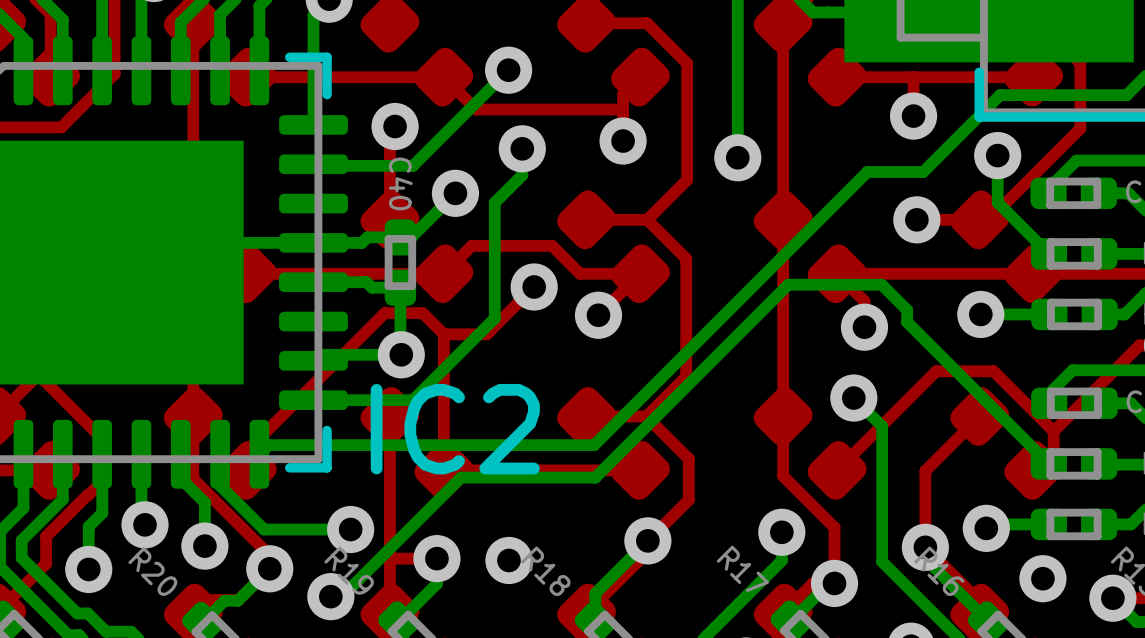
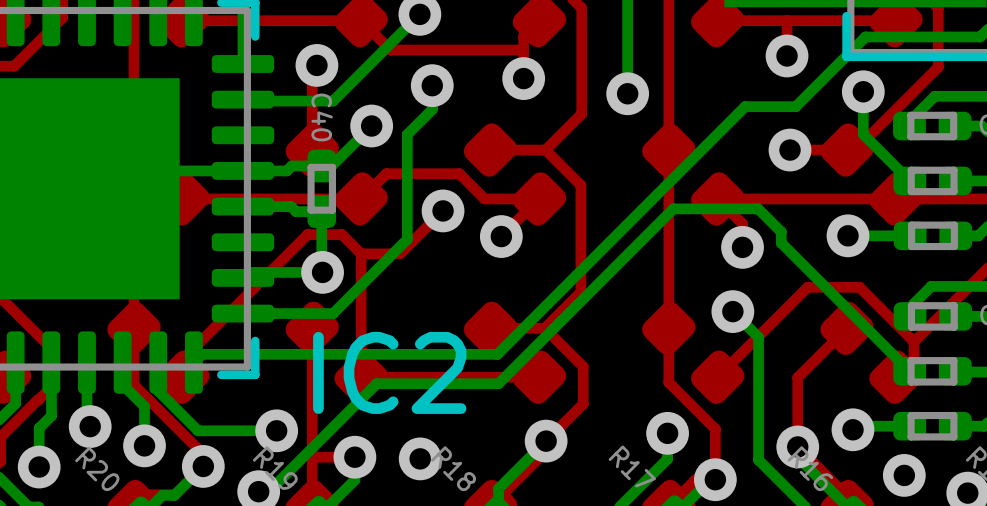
IC2 name position: IC2 (455, 429) -> IC2 (389, 372)

